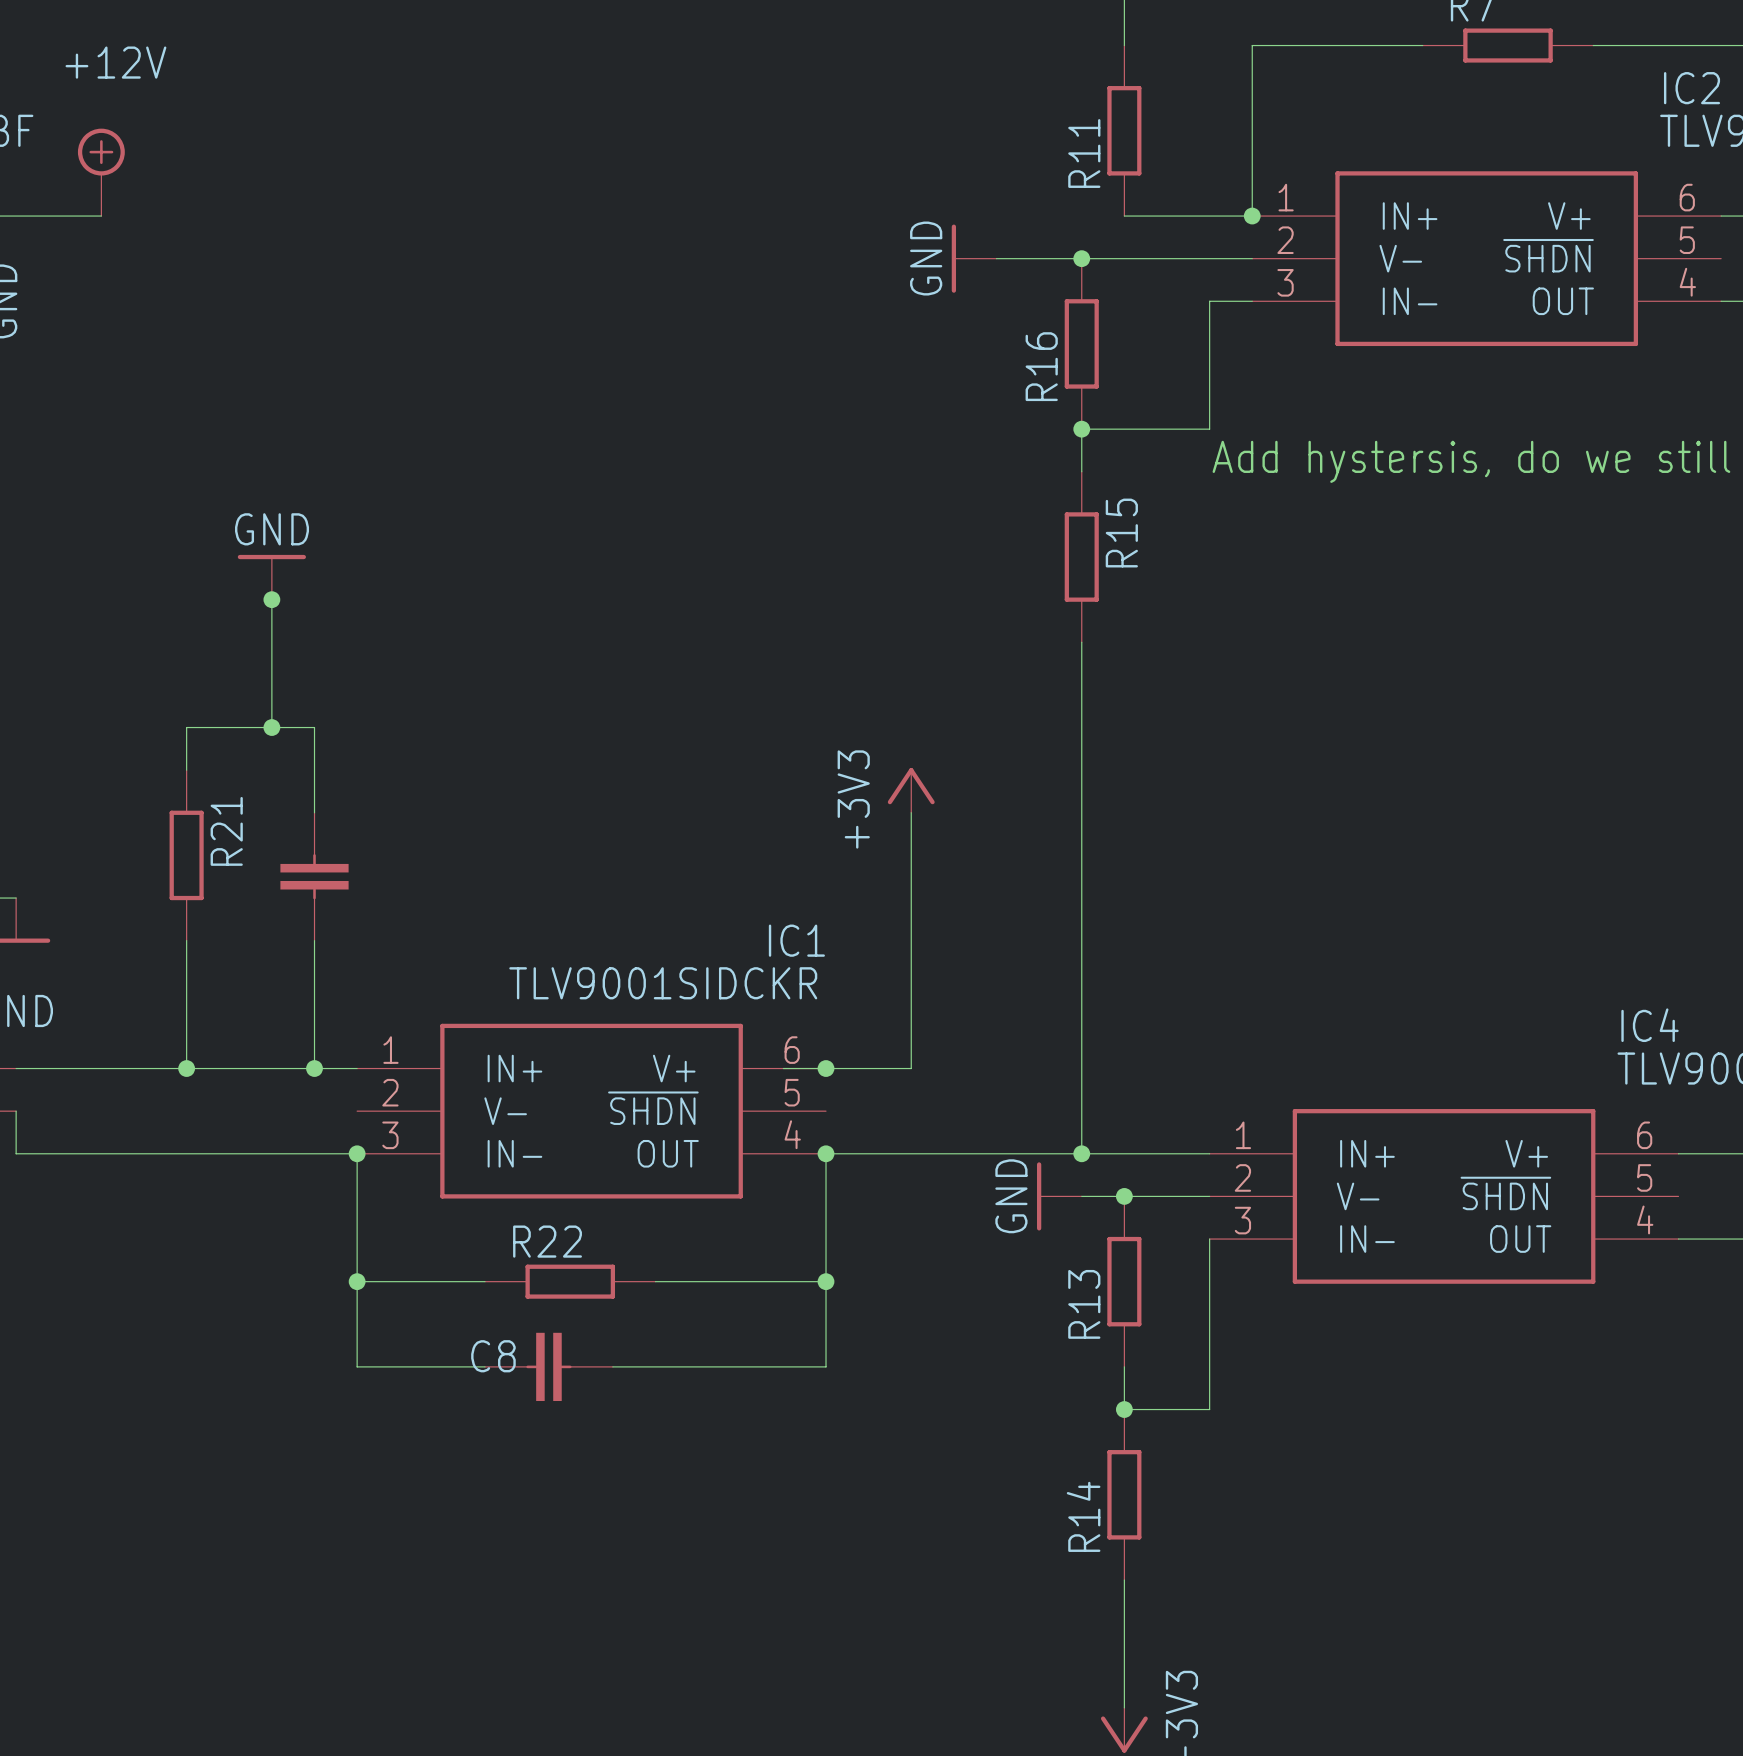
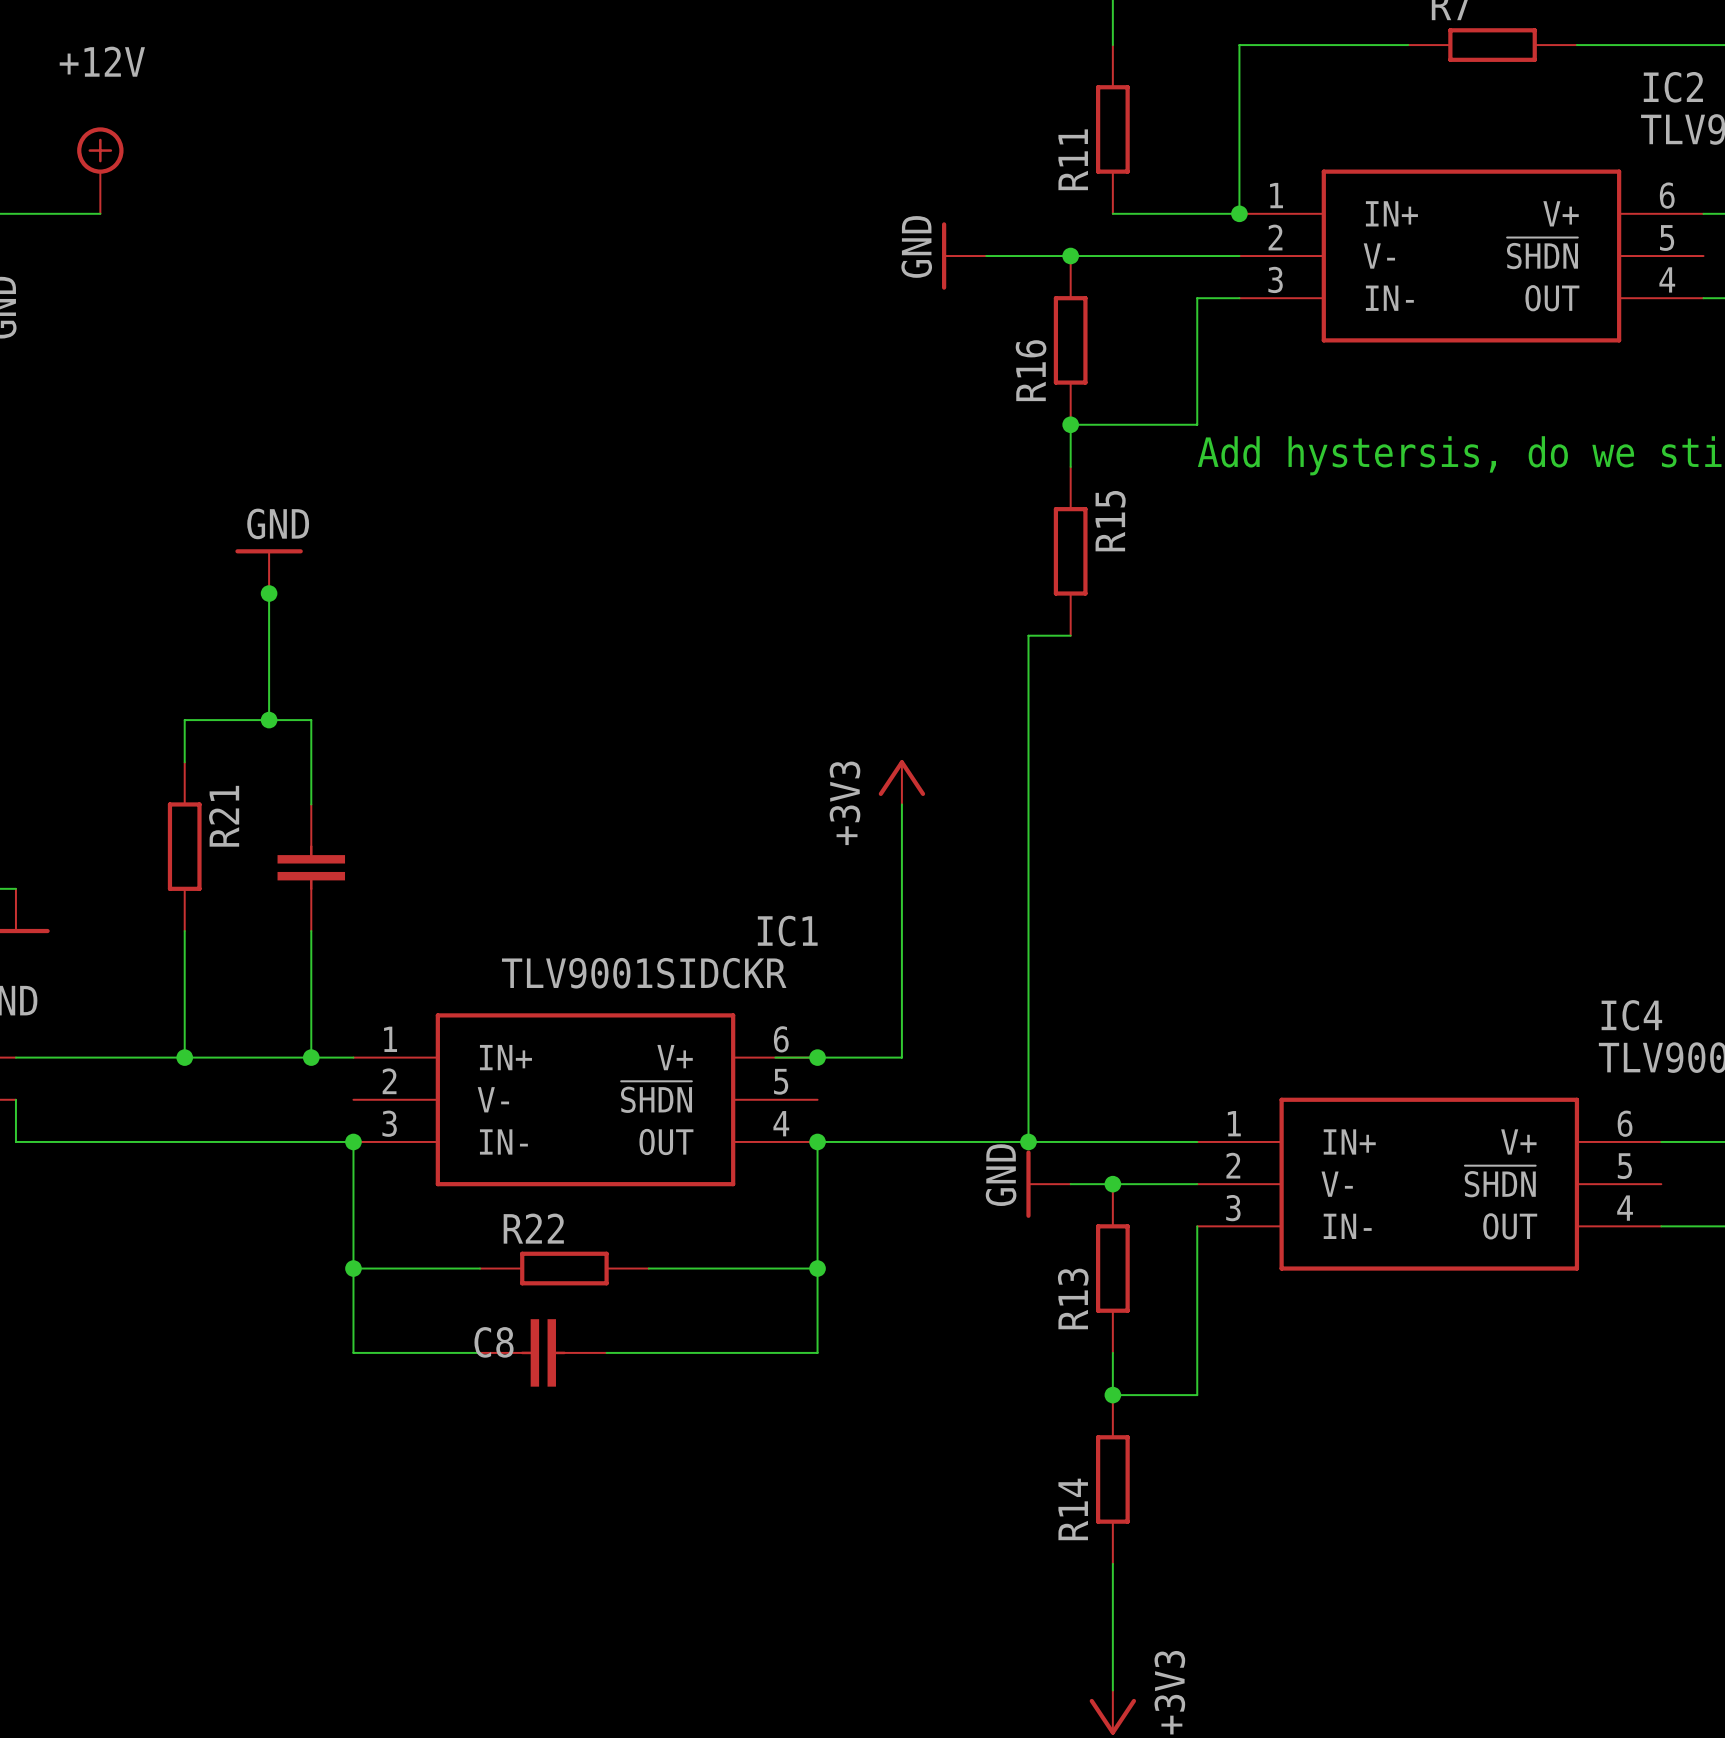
wire: (1081, 642) (1081, 1153) -> (1070, 635) (1028, 635) (1028, 1141)
junction position: (1081, 1153) -> (1028, 1141)

